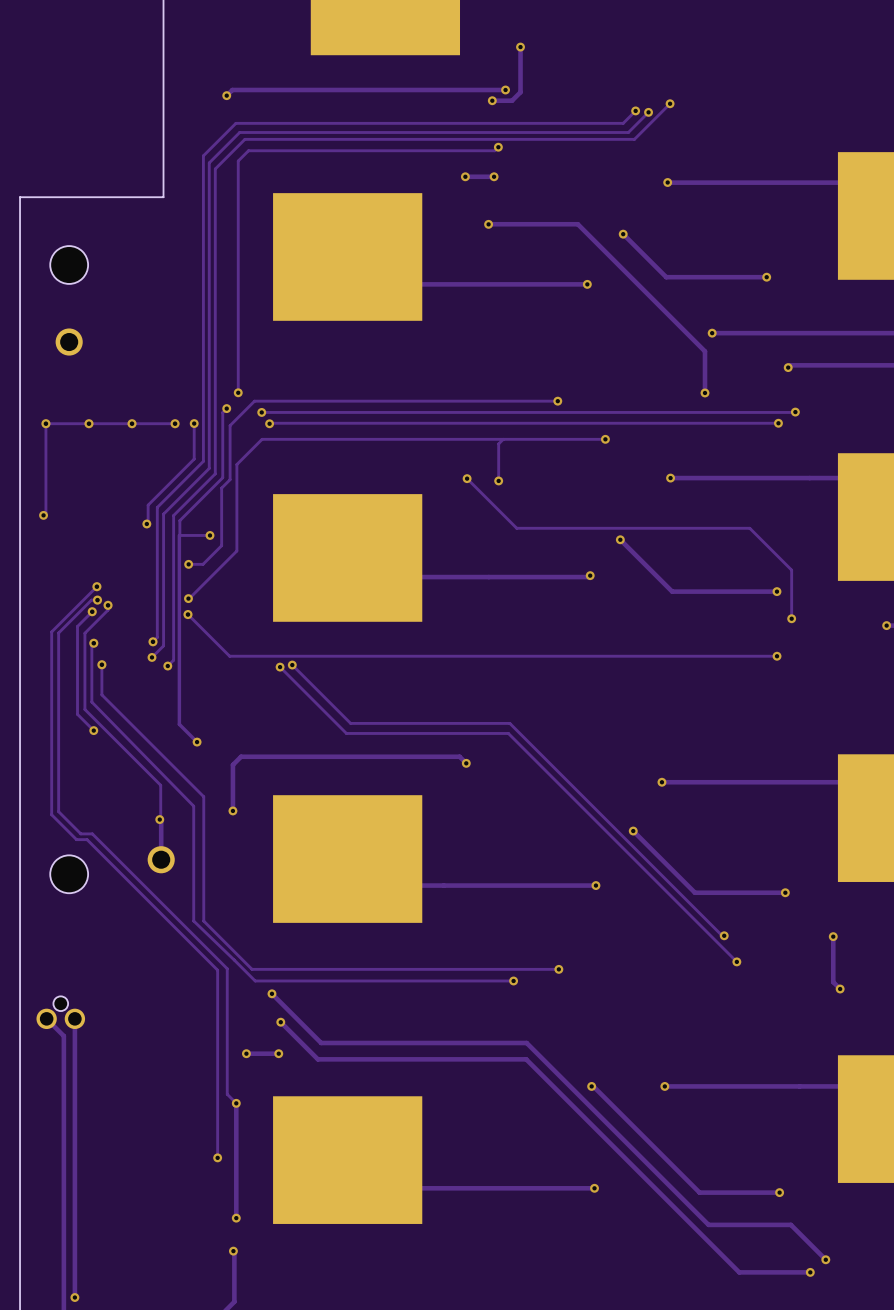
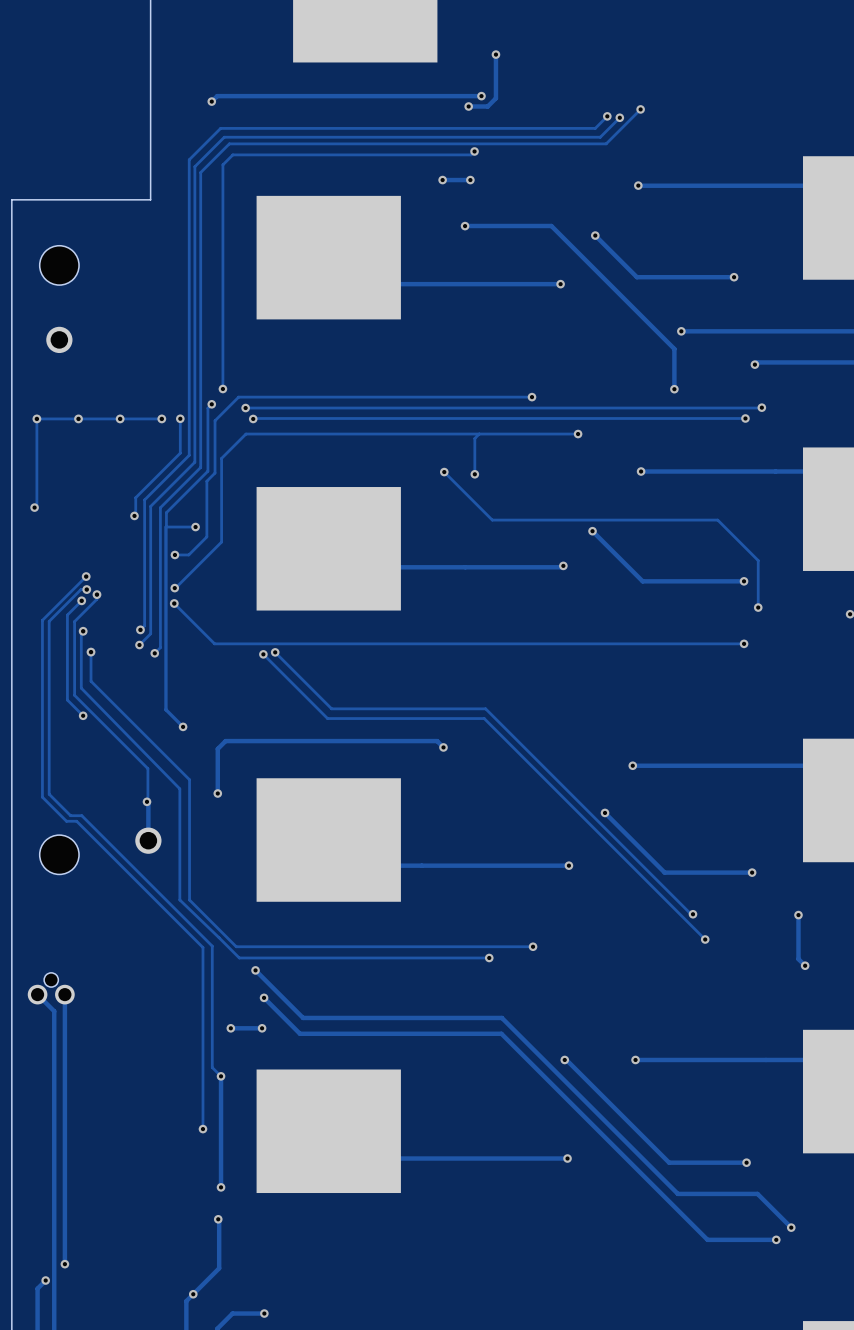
part: (69, 265) -> none
hole: none -> (59, 265)
part: (69, 874) -> none
hole: none -> (59, 854)

